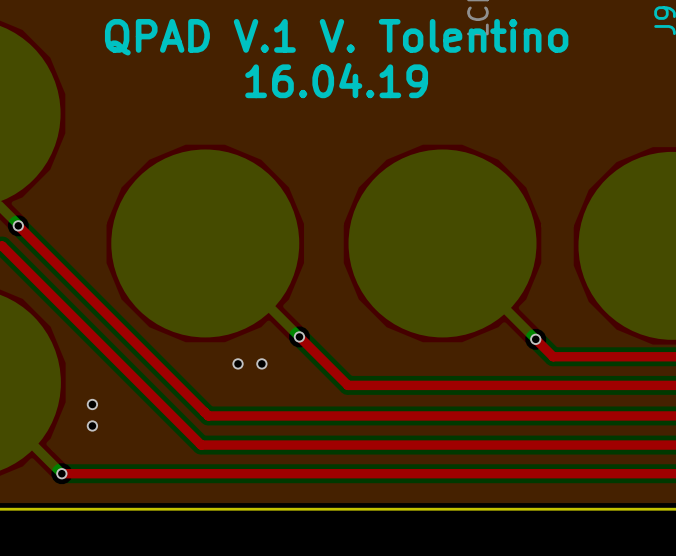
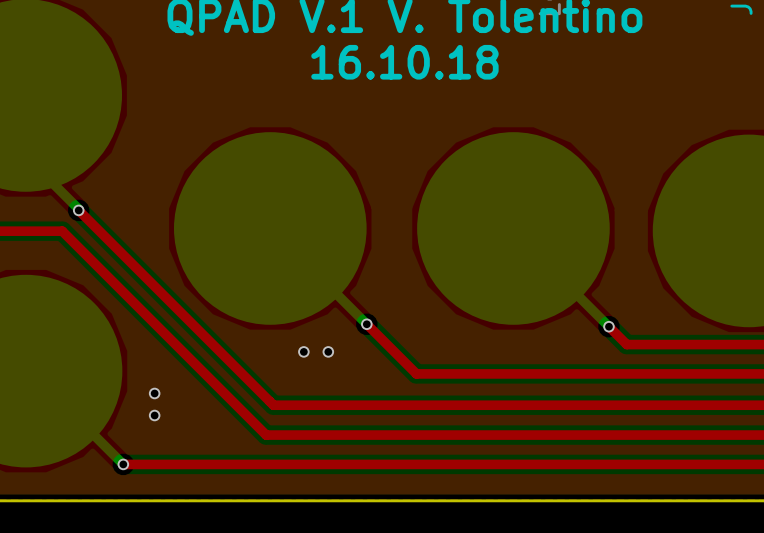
text: 16.04.19 (336, 80) -> 16.10.18 (404, 62)

